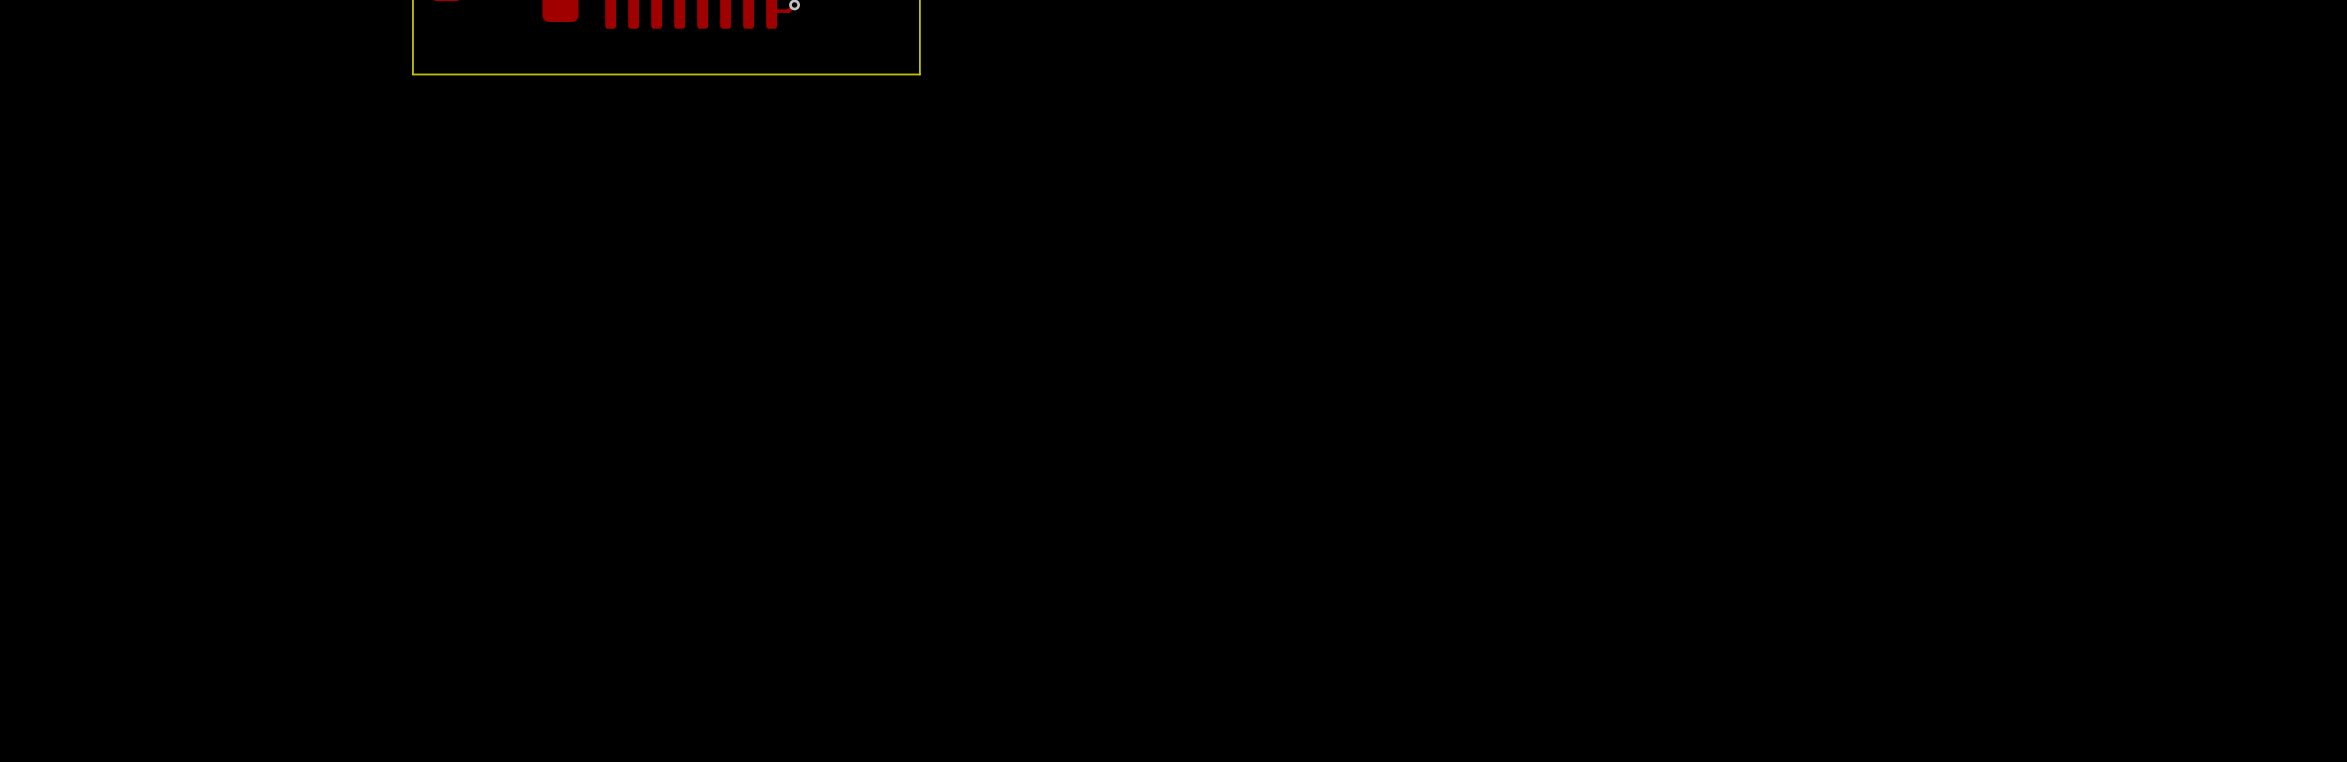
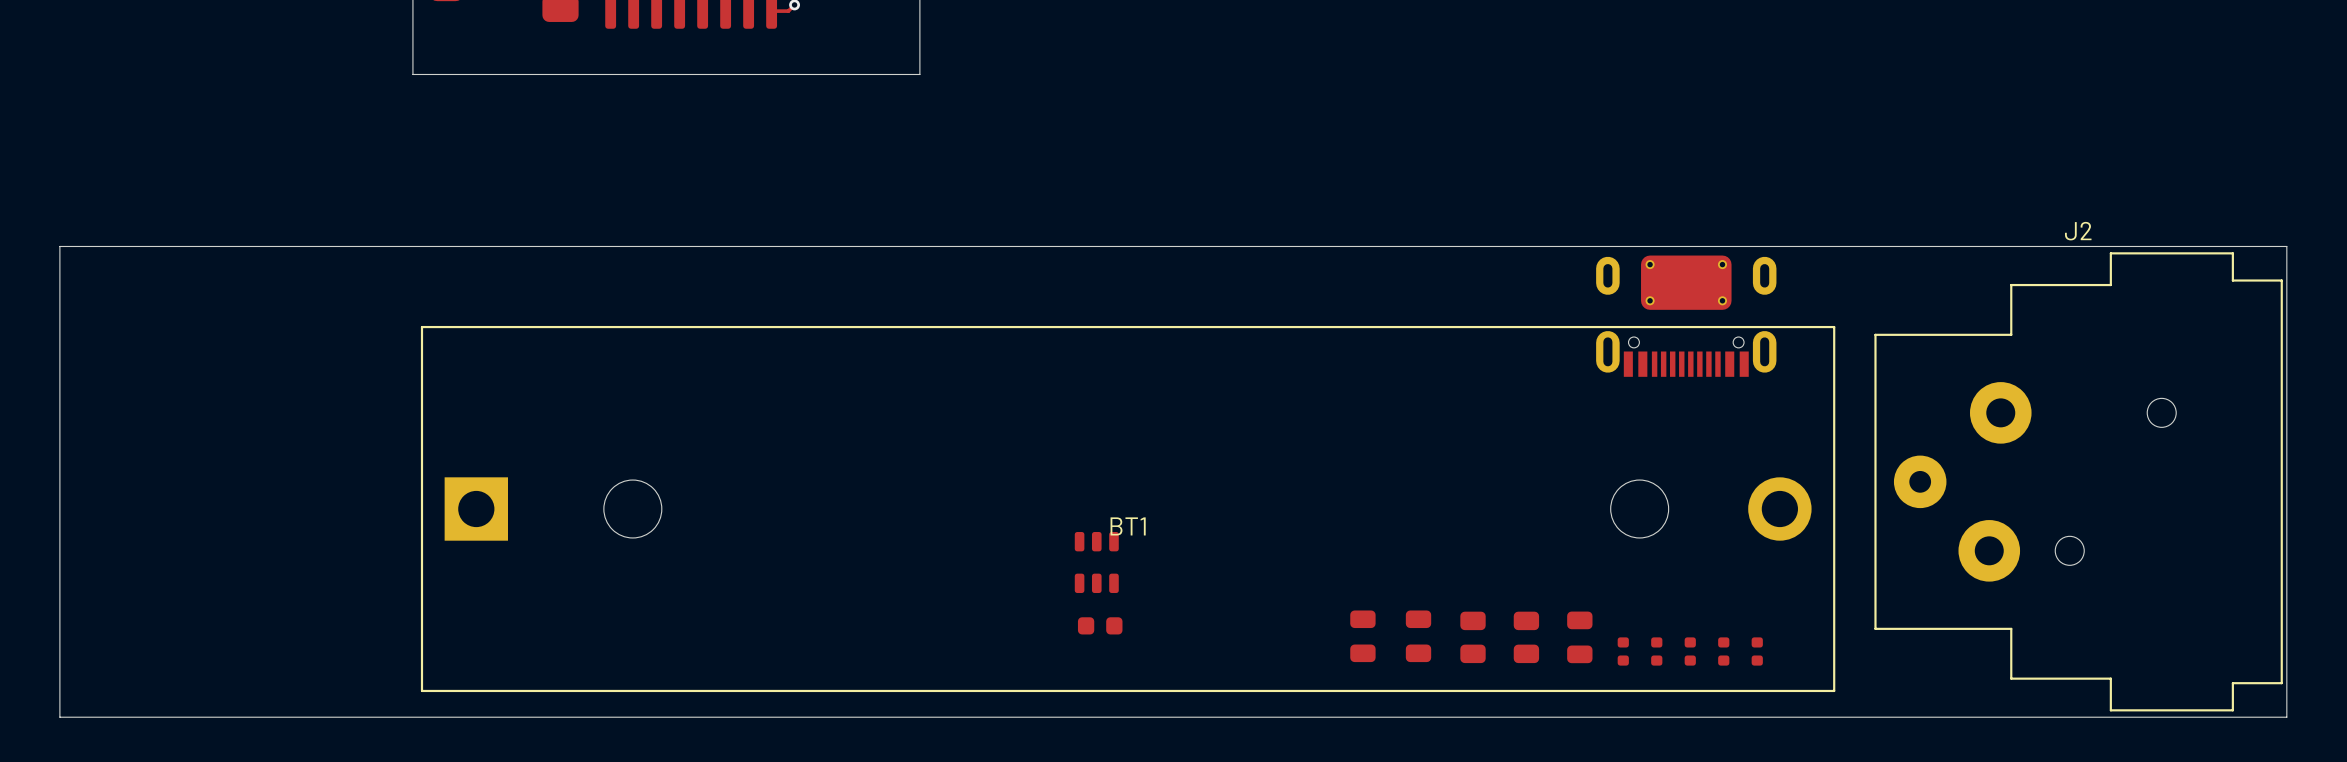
board edge: none -> (2286, 246) (59, 246) (59, 717) (2286, 717) (2286, 246)
part: none -> (1686, 316)
J2: none -> (2078, 481)
BT1: none -> (1128, 509)
part: none -> (1096, 562)
part: none -> (1100, 625)
part: none -> (1362, 636)
part: none -> (1418, 636)
part: none -> (1473, 637)
part: none -> (1526, 637)
part: none -> (1579, 637)
part: none -> (1623, 651)
part: none -> (1656, 651)
part: none -> (1690, 651)
part: none -> (1723, 651)
part: none -> (1757, 651)

